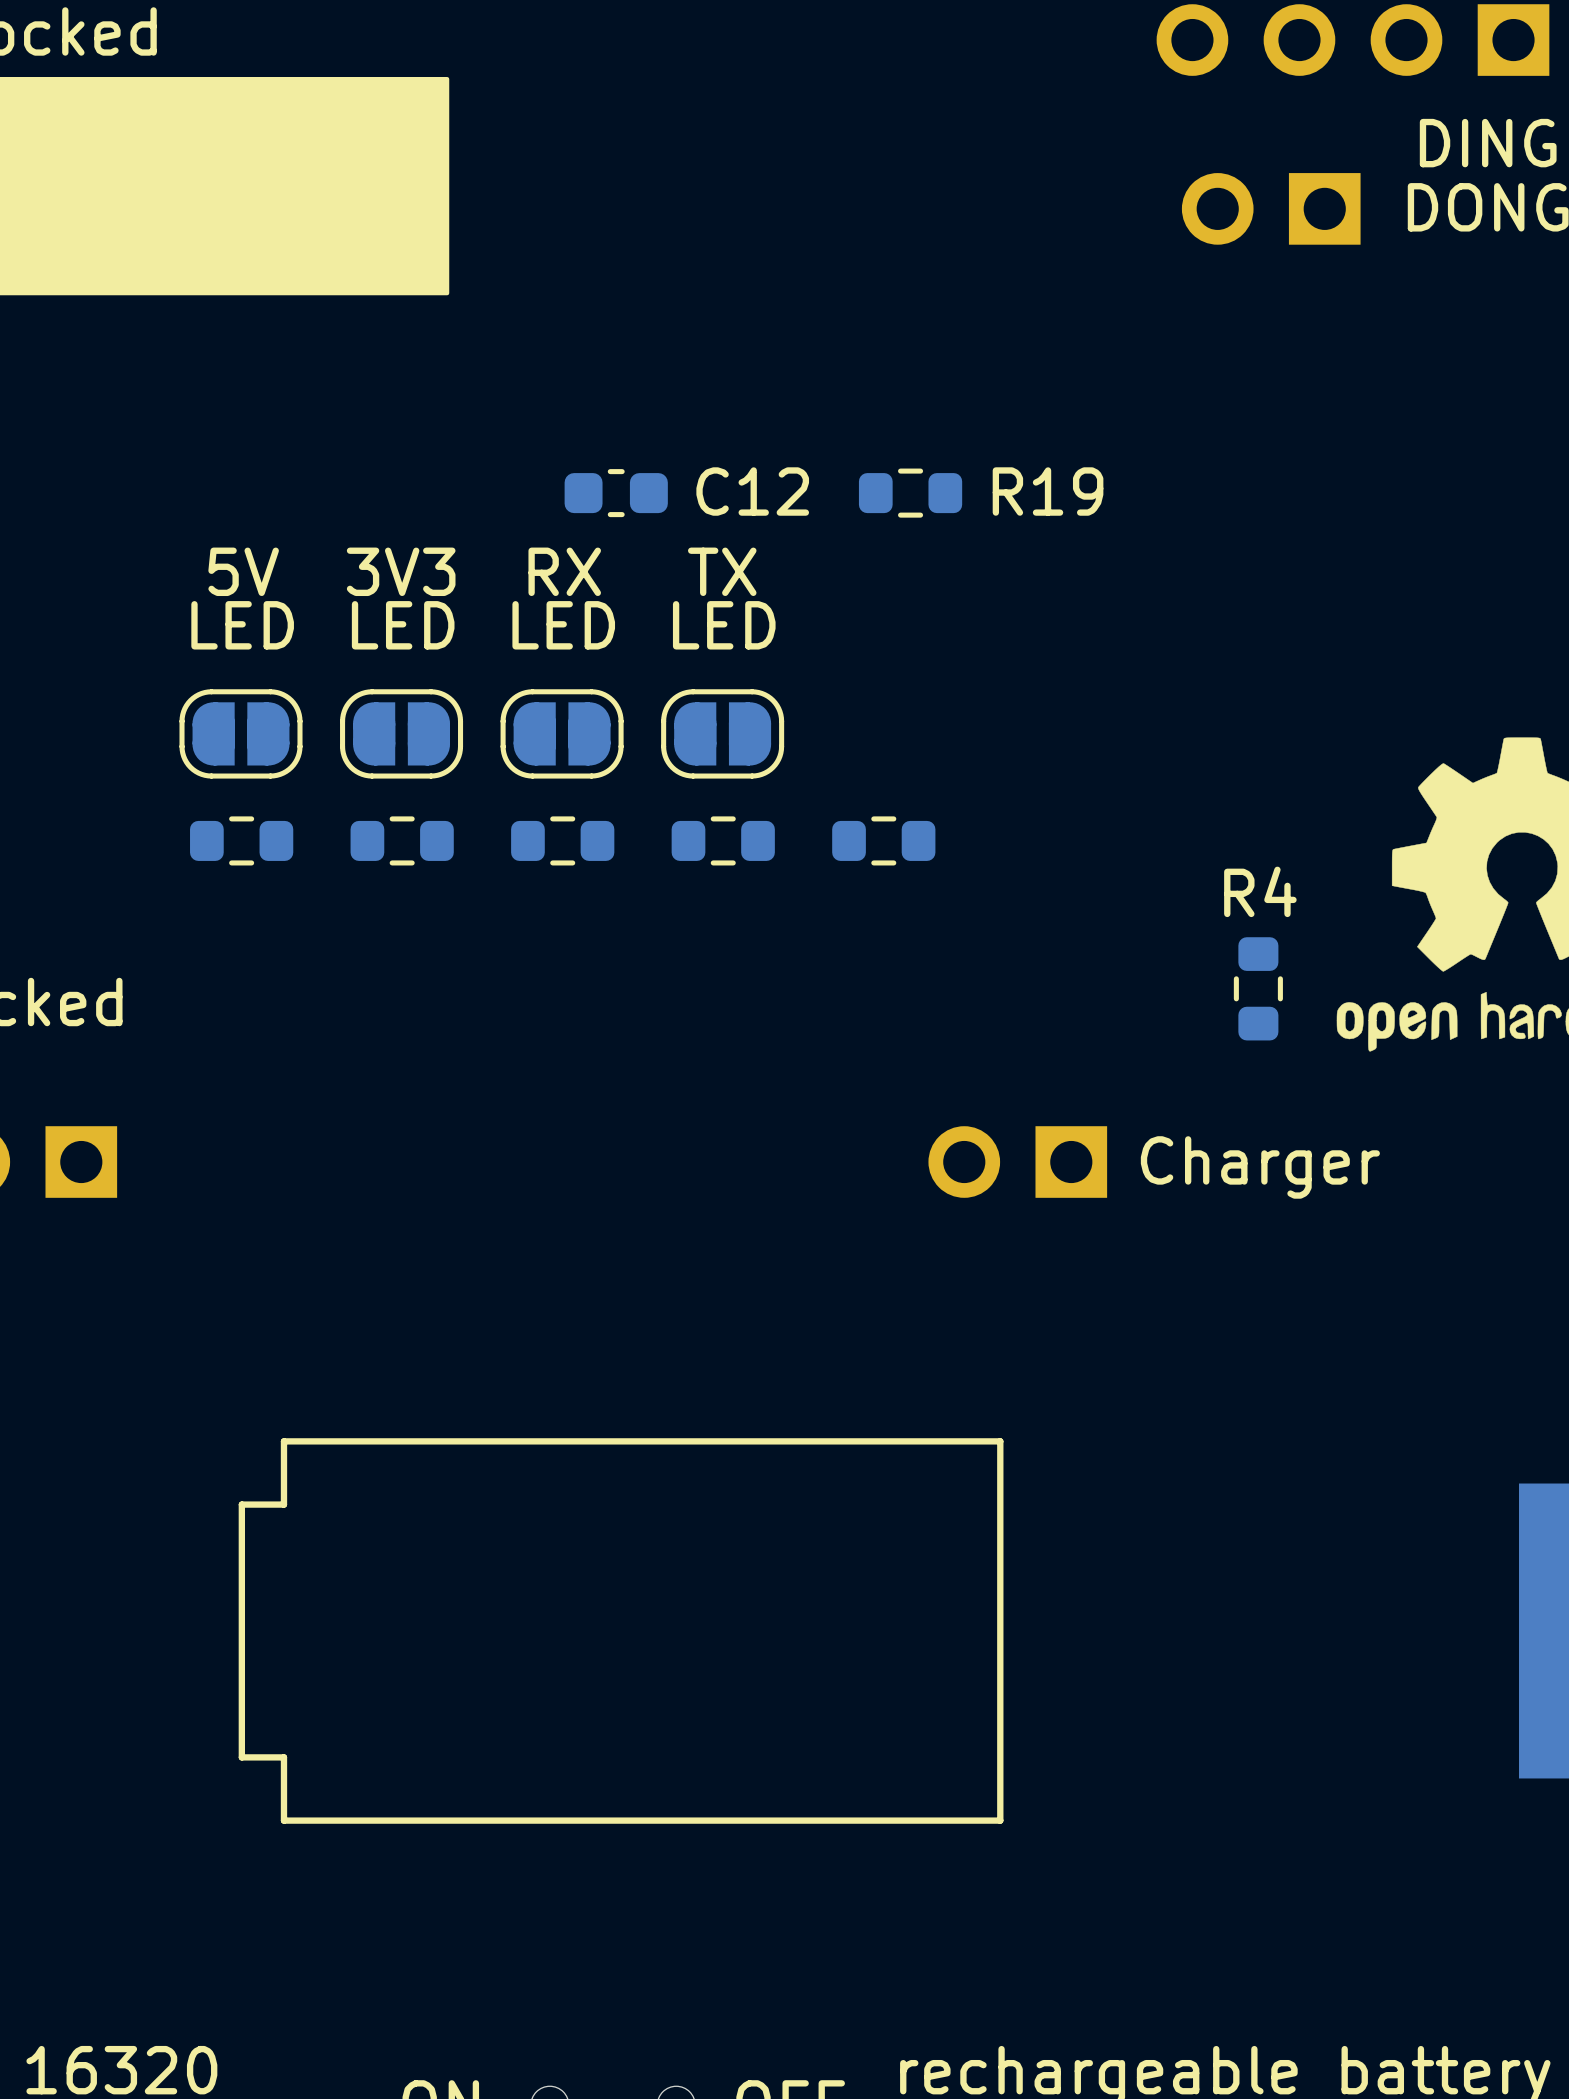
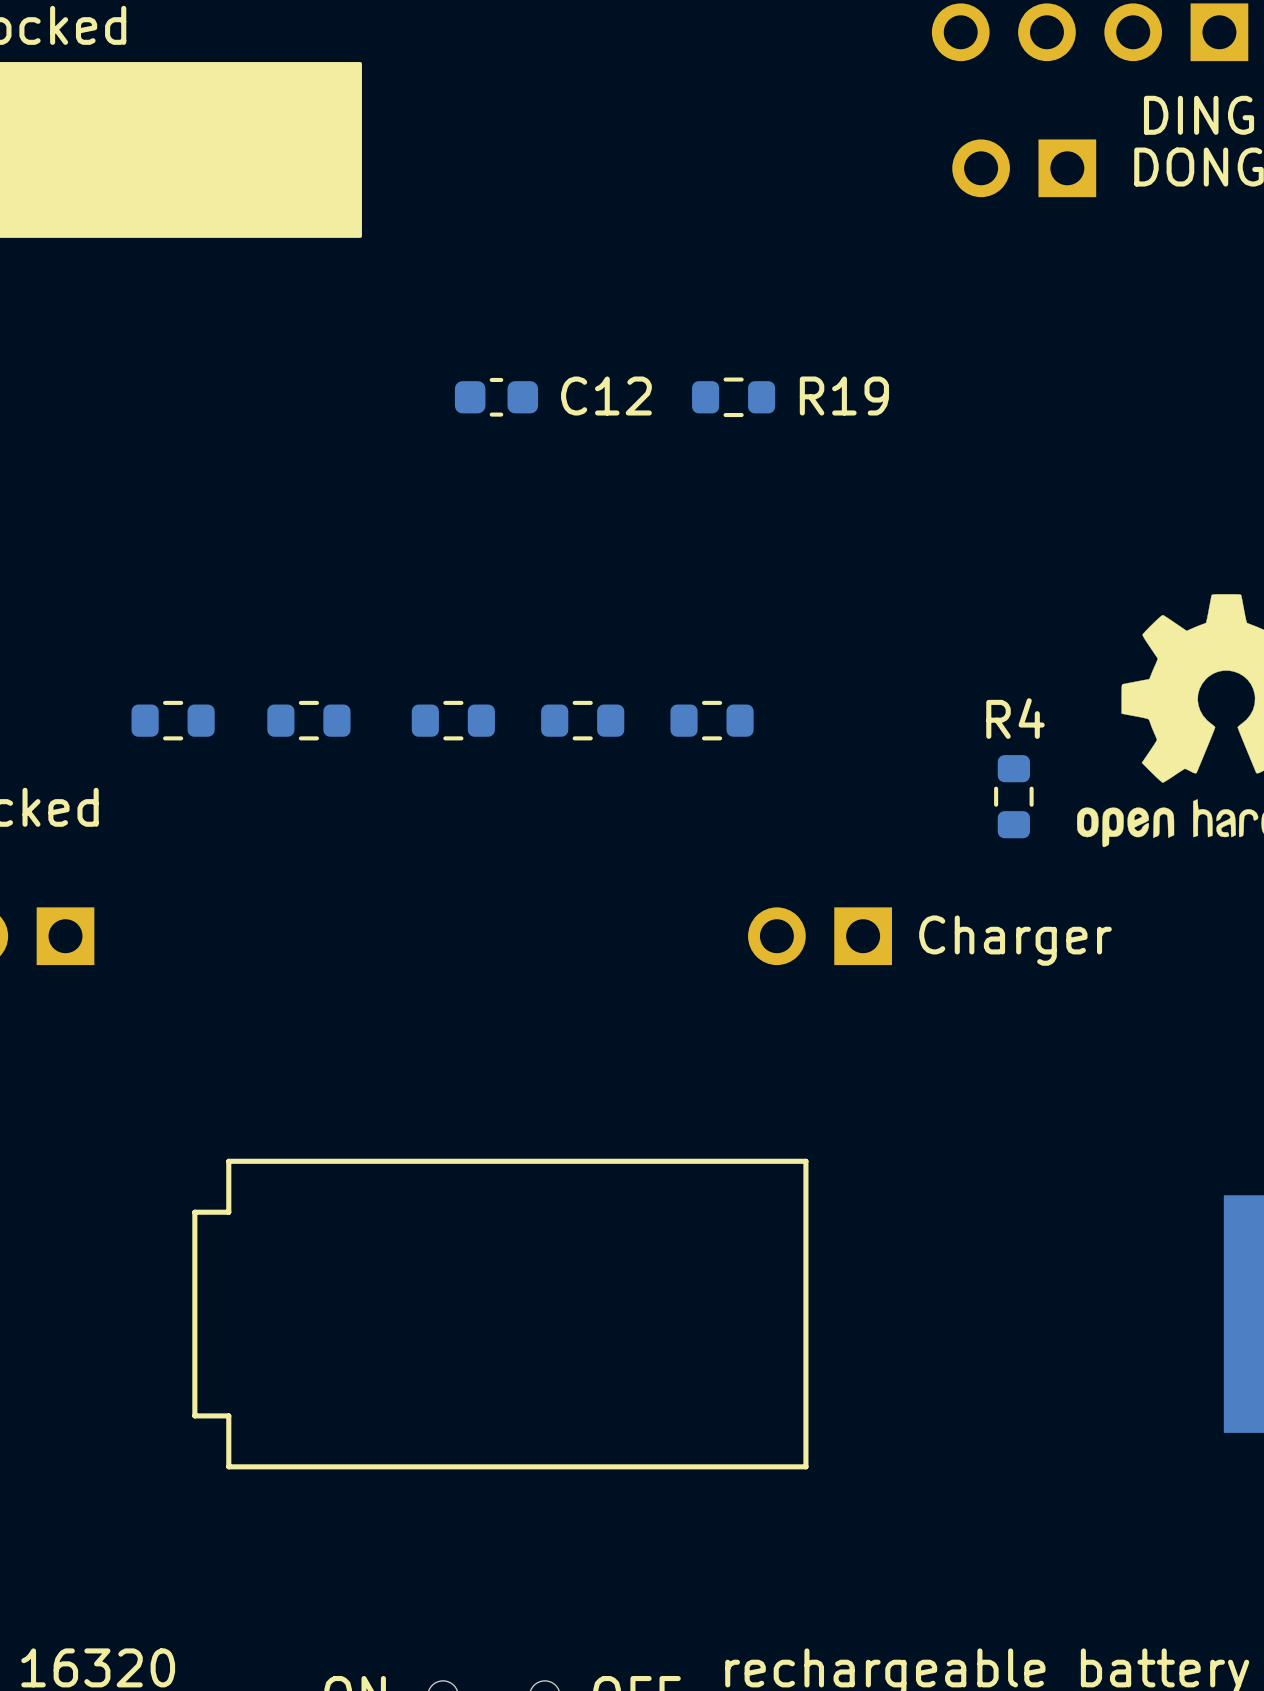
part: (241, 733) -> none
part: (401, 733) -> none
part: (562, 733) -> none
part: (722, 733) -> none
part position: (241, 840) -> (173, 720)
part position: (402, 840) -> (308, 720)
part position: (562, 840) -> (453, 720)
part position: (723, 840) -> (582, 720)
part position: (883, 840) -> (712, 720)

